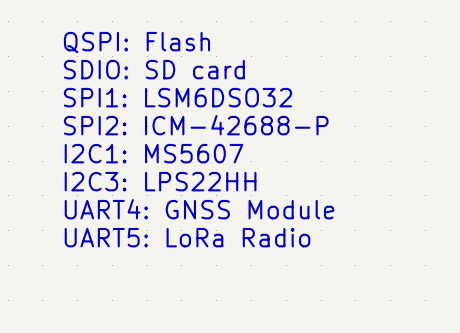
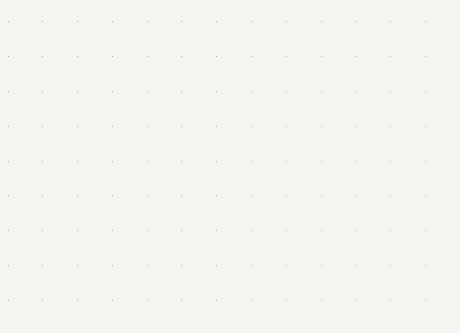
text: QSPI: Flash (136, 42) -> none
text: SDIO: SD card (154, 69) -> none
text: SPI1: LSM6DSO32 (177, 97) -> none
text: SPI2: ICM-42688-P (196, 125) -> none
text: I2C1: MS5607 (153, 153) -> none
text: I2C3: LPS22HH (160, 181) -> none
text: UART4: GNSS Module (199, 209) -> none
text: UART5: LoRa Radio (187, 237) -> none

